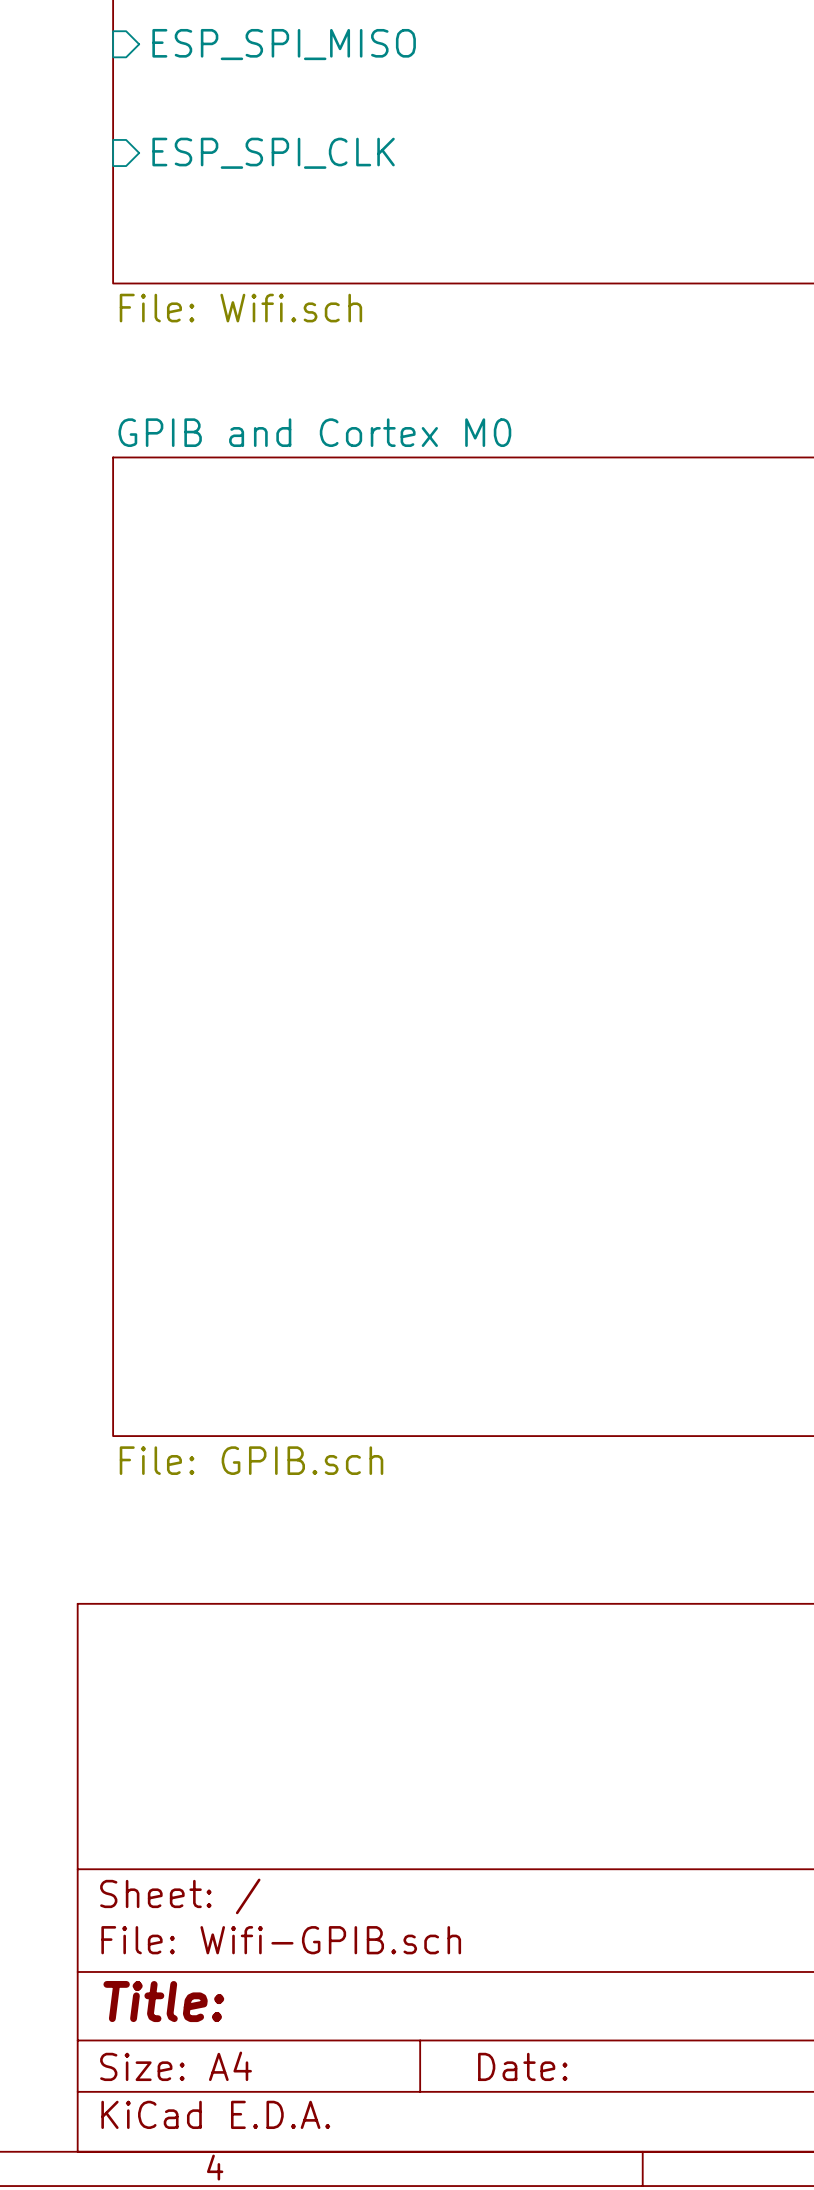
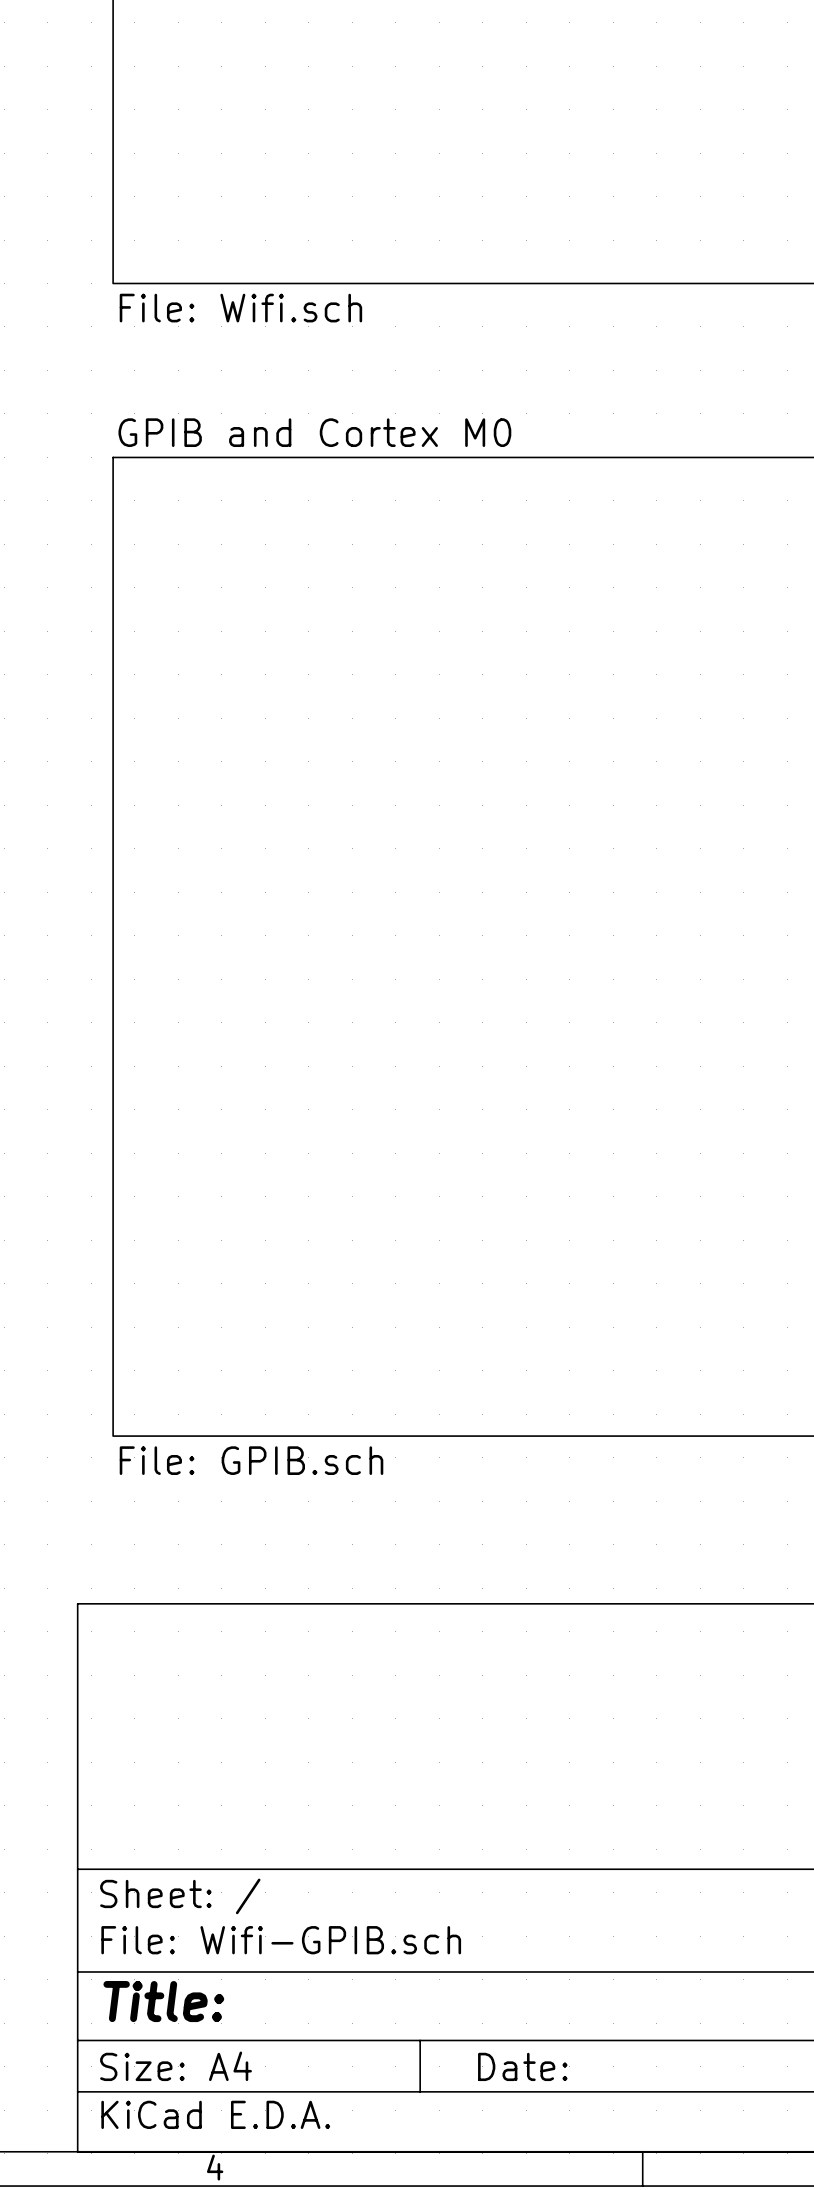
sheet pin: ESP_SPI_MISO (284, 44) -> none
sheet pin: ESP_SPI_CLK (273, 153) -> none

